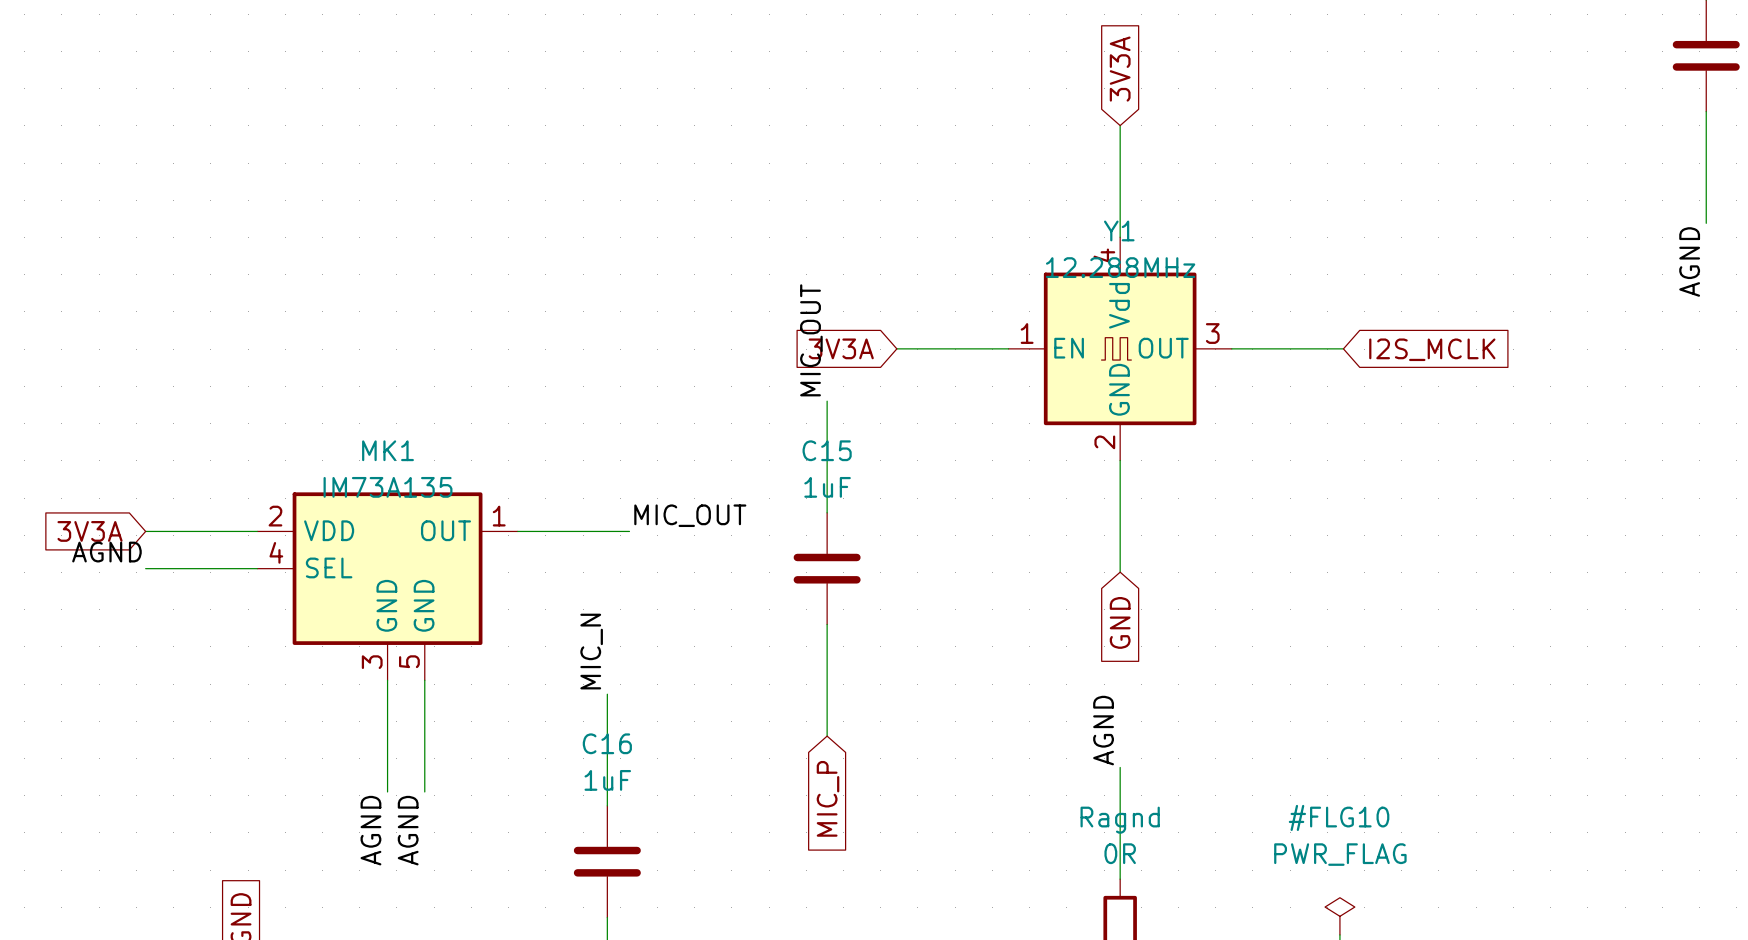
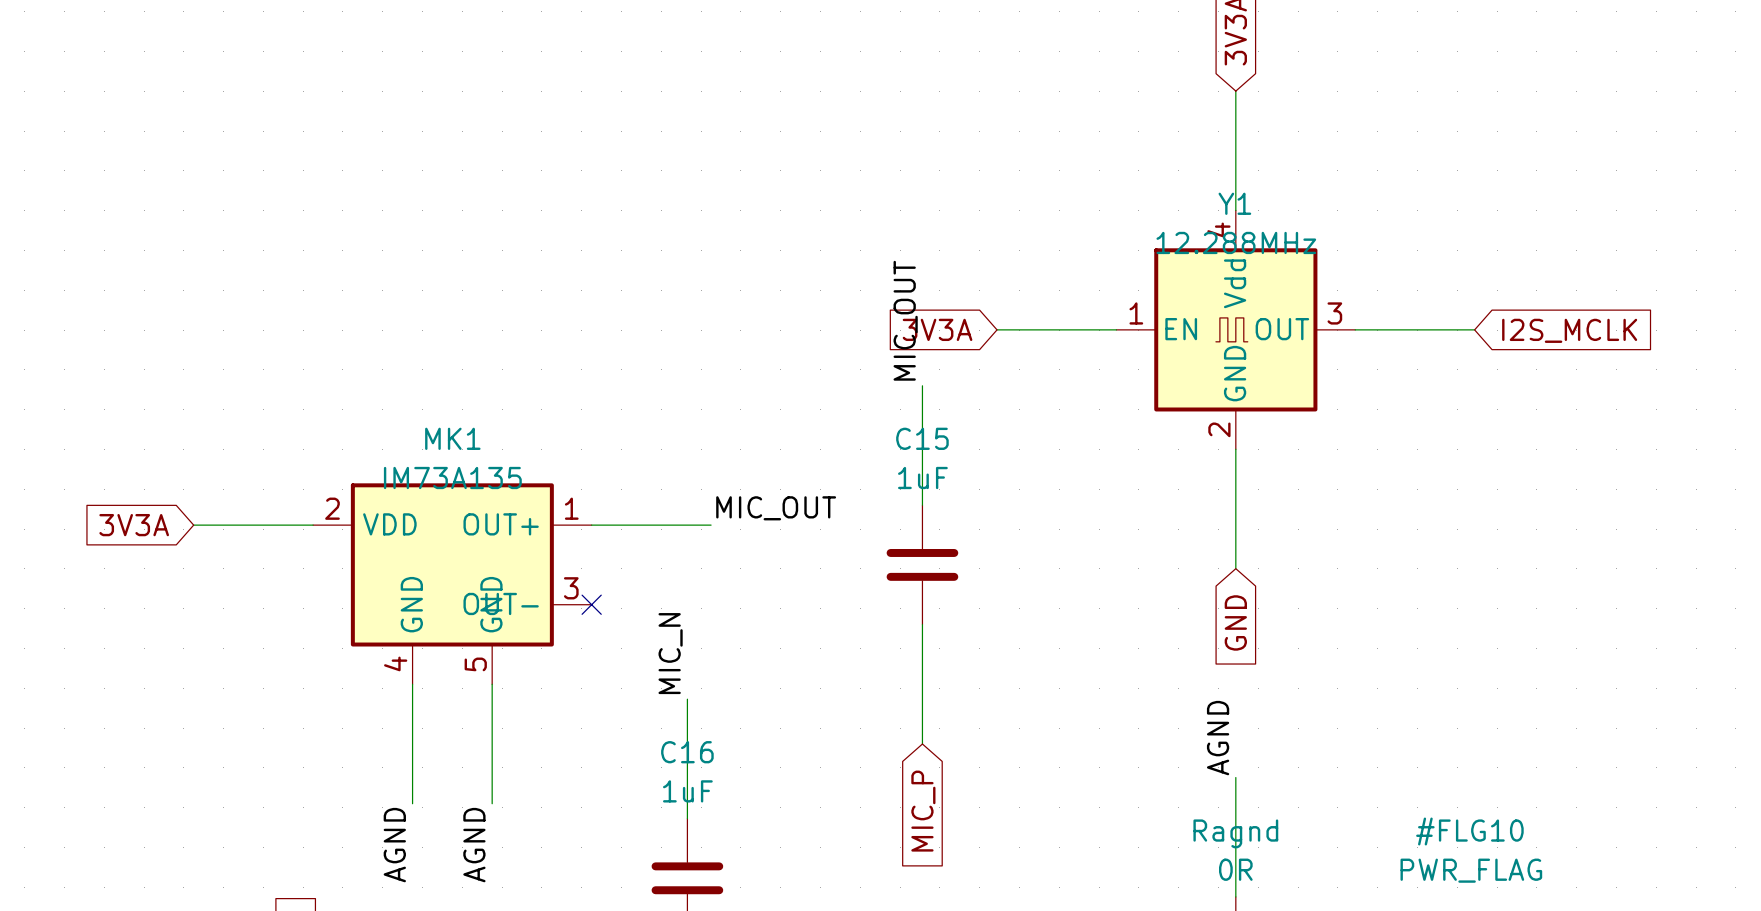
MK1 symbol: [257, 492, 518, 681] -> [313, 483, 592, 685]
label: AGND (106, 552) -> none
wire: (145, 568) (257, 568) -> none
no-connect mark: none -> (591, 604)
wire: (387, 680) (387, 791) -> (412, 684) (412, 803)
label position: AGND (370, 830) -> AGND (394, 845)

